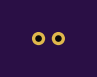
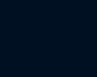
part: (48, 38) -> none

